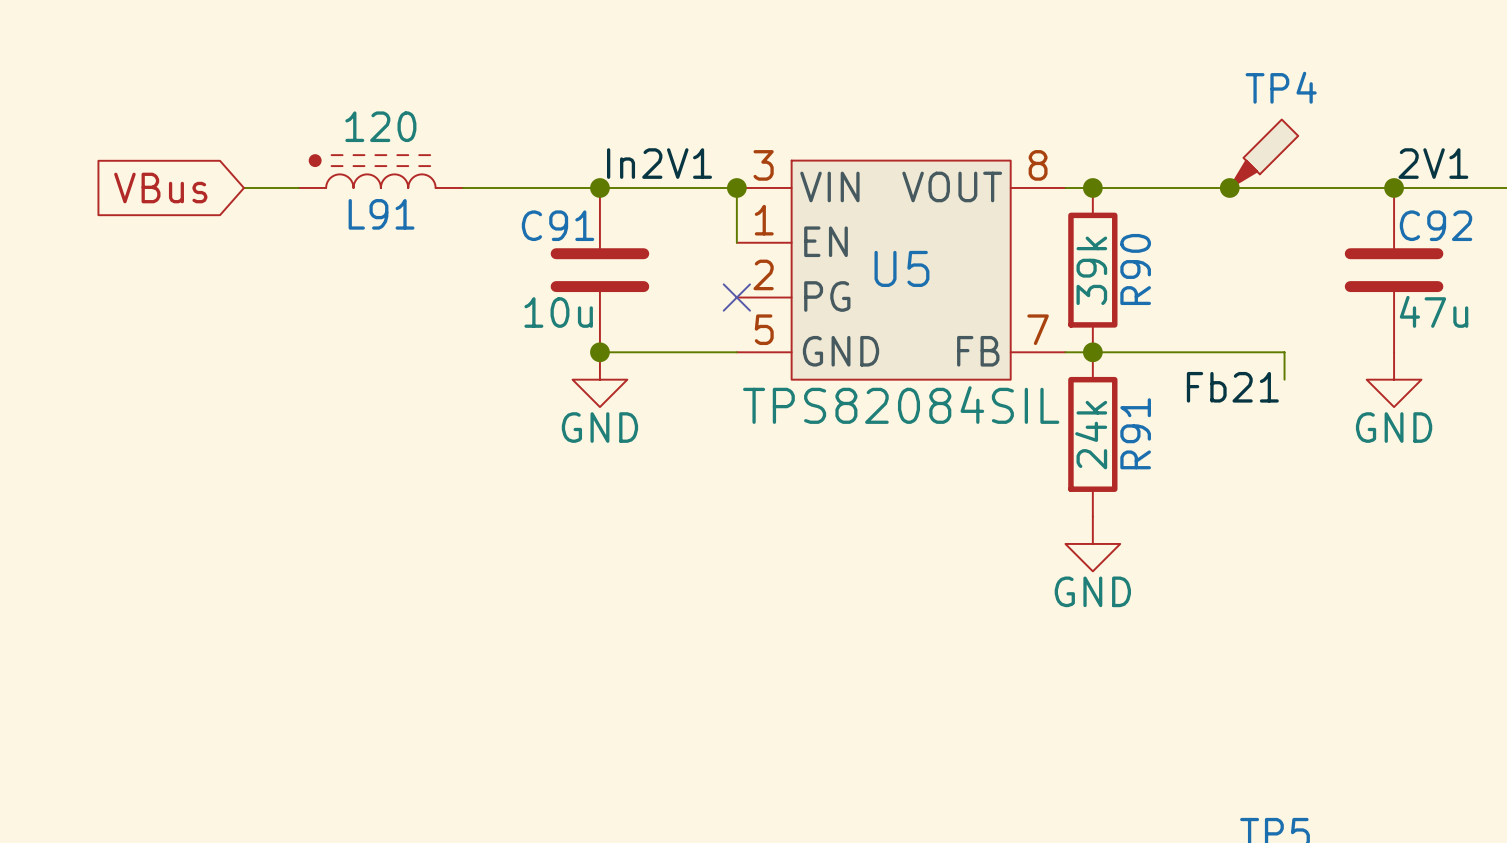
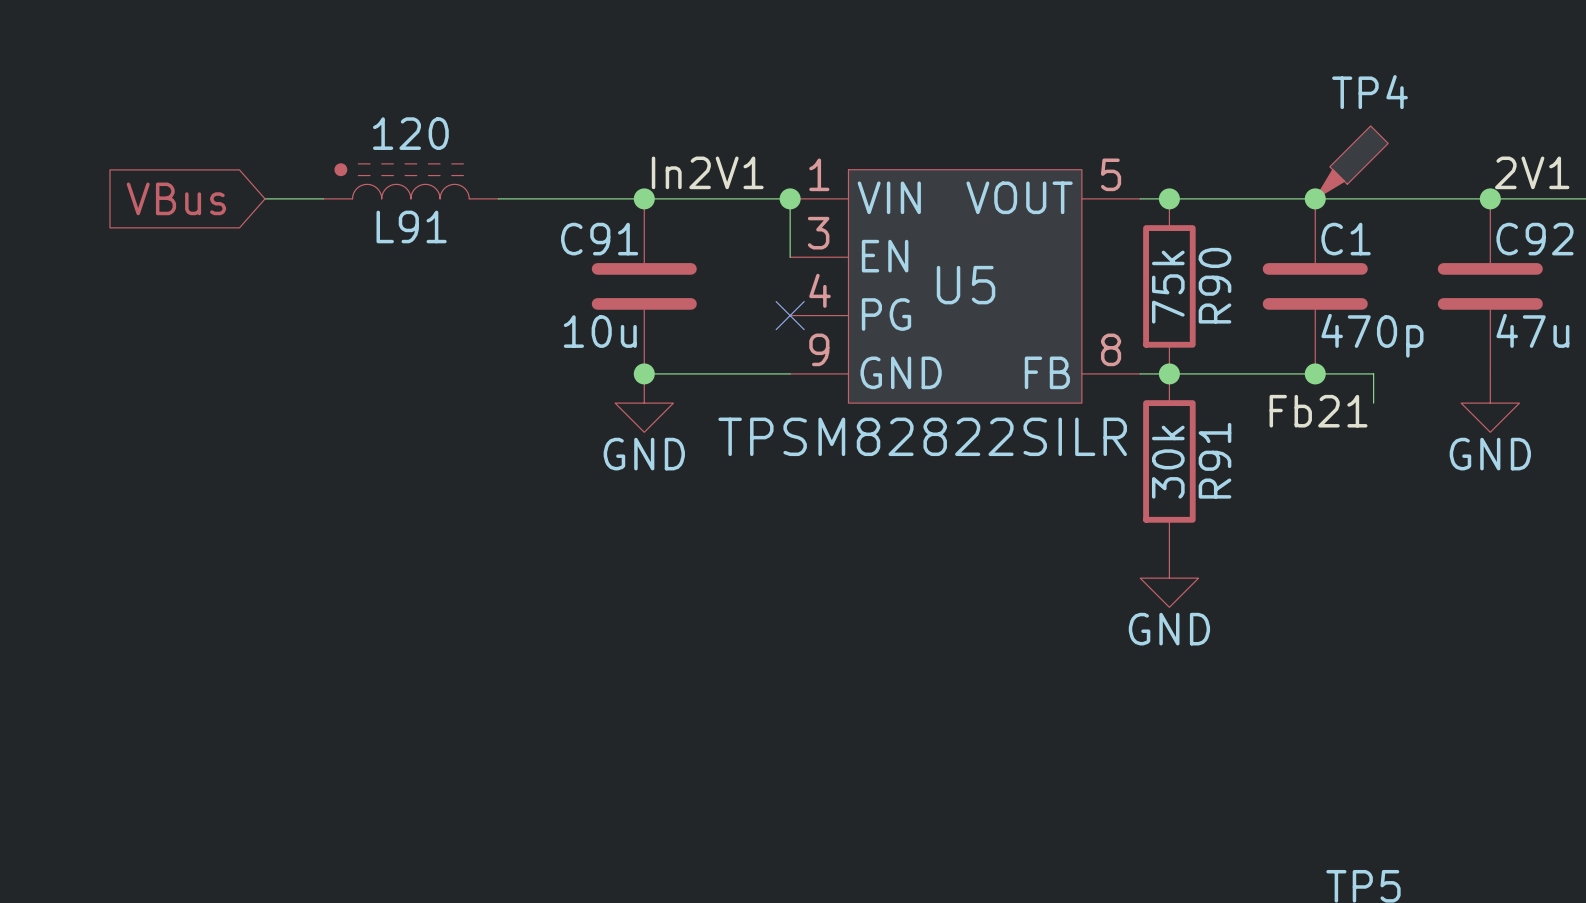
U5 pin number: 3 (763, 165) -> 1 (819, 174)
U5 pin number: 8 (1038, 165) -> 5 (1111, 174)
U5 pin number: 1 (764, 220) -> 3 (818, 233)
R90 value: 39k (1091, 270) -> 75k (1168, 287)
C1: none -> 470p (1315, 286)
U5 pin number: 2 (763, 274) -> 4 (820, 290)
U5 pin number: 5 (764, 329) -> 9 (819, 349)
U5 pin number: 7 (1038, 329) -> 8 (1111, 349)
junction: none -> (1315, 373)
U5 value: TPS82084SIL (901, 405) -> TPSM82822SILR (922, 436)
R91 value: 24k (1091, 435) -> 30k (1168, 462)

